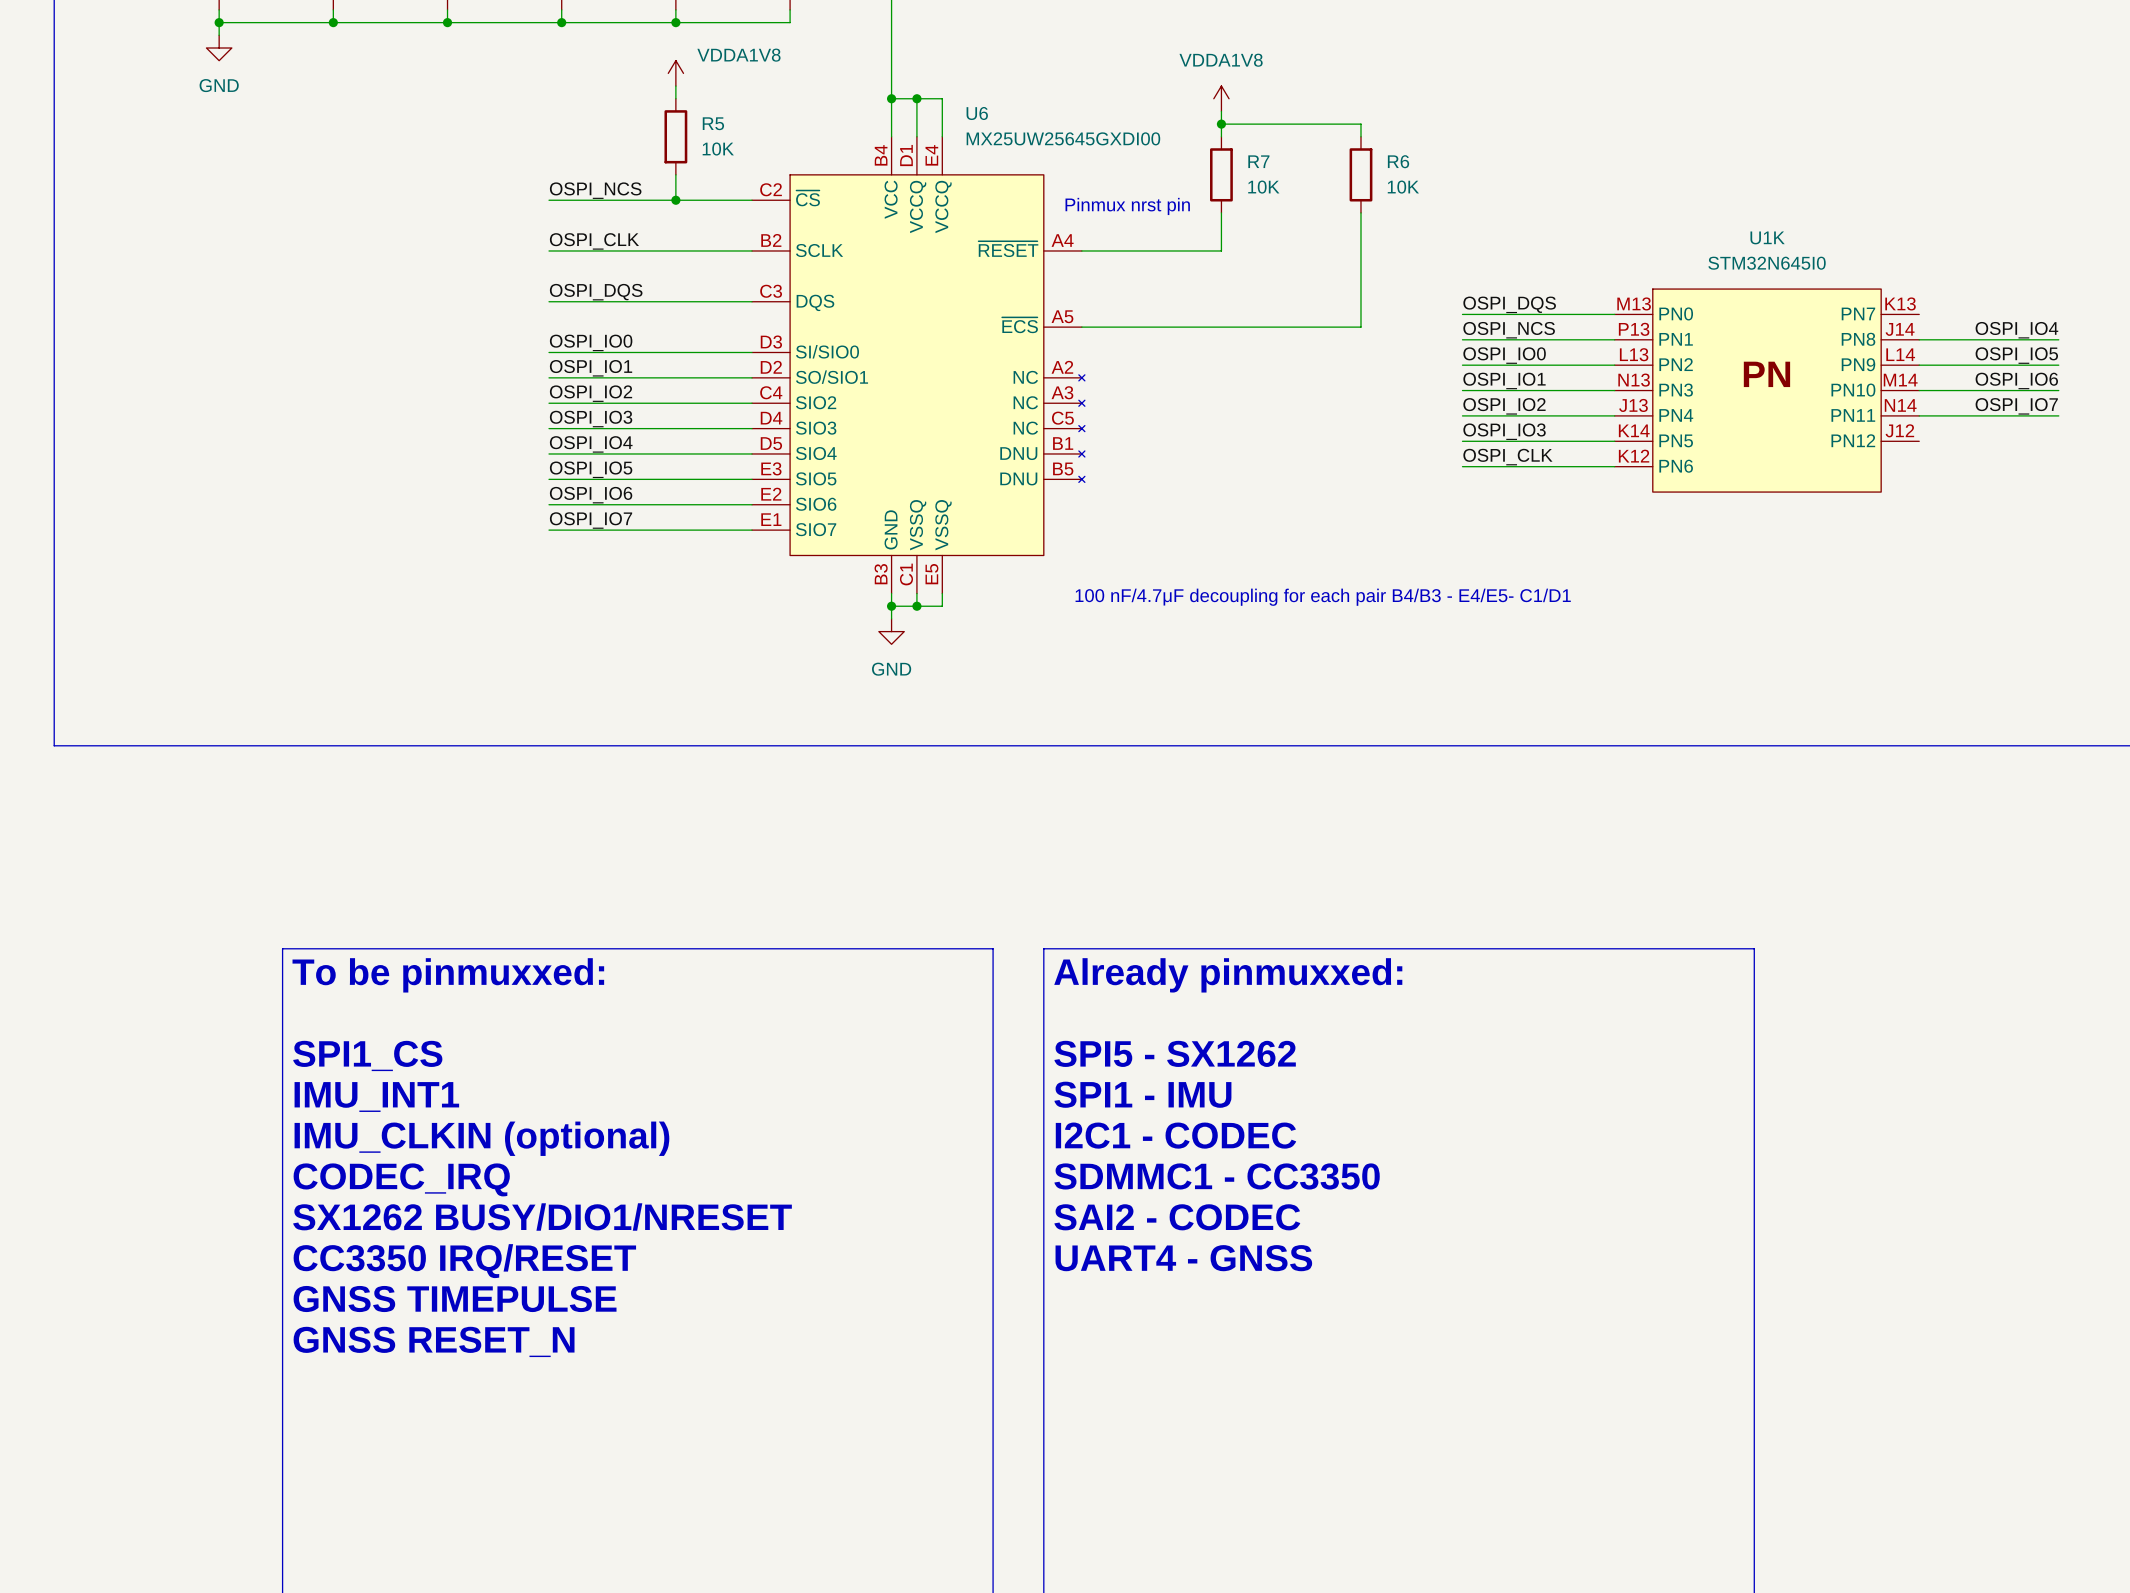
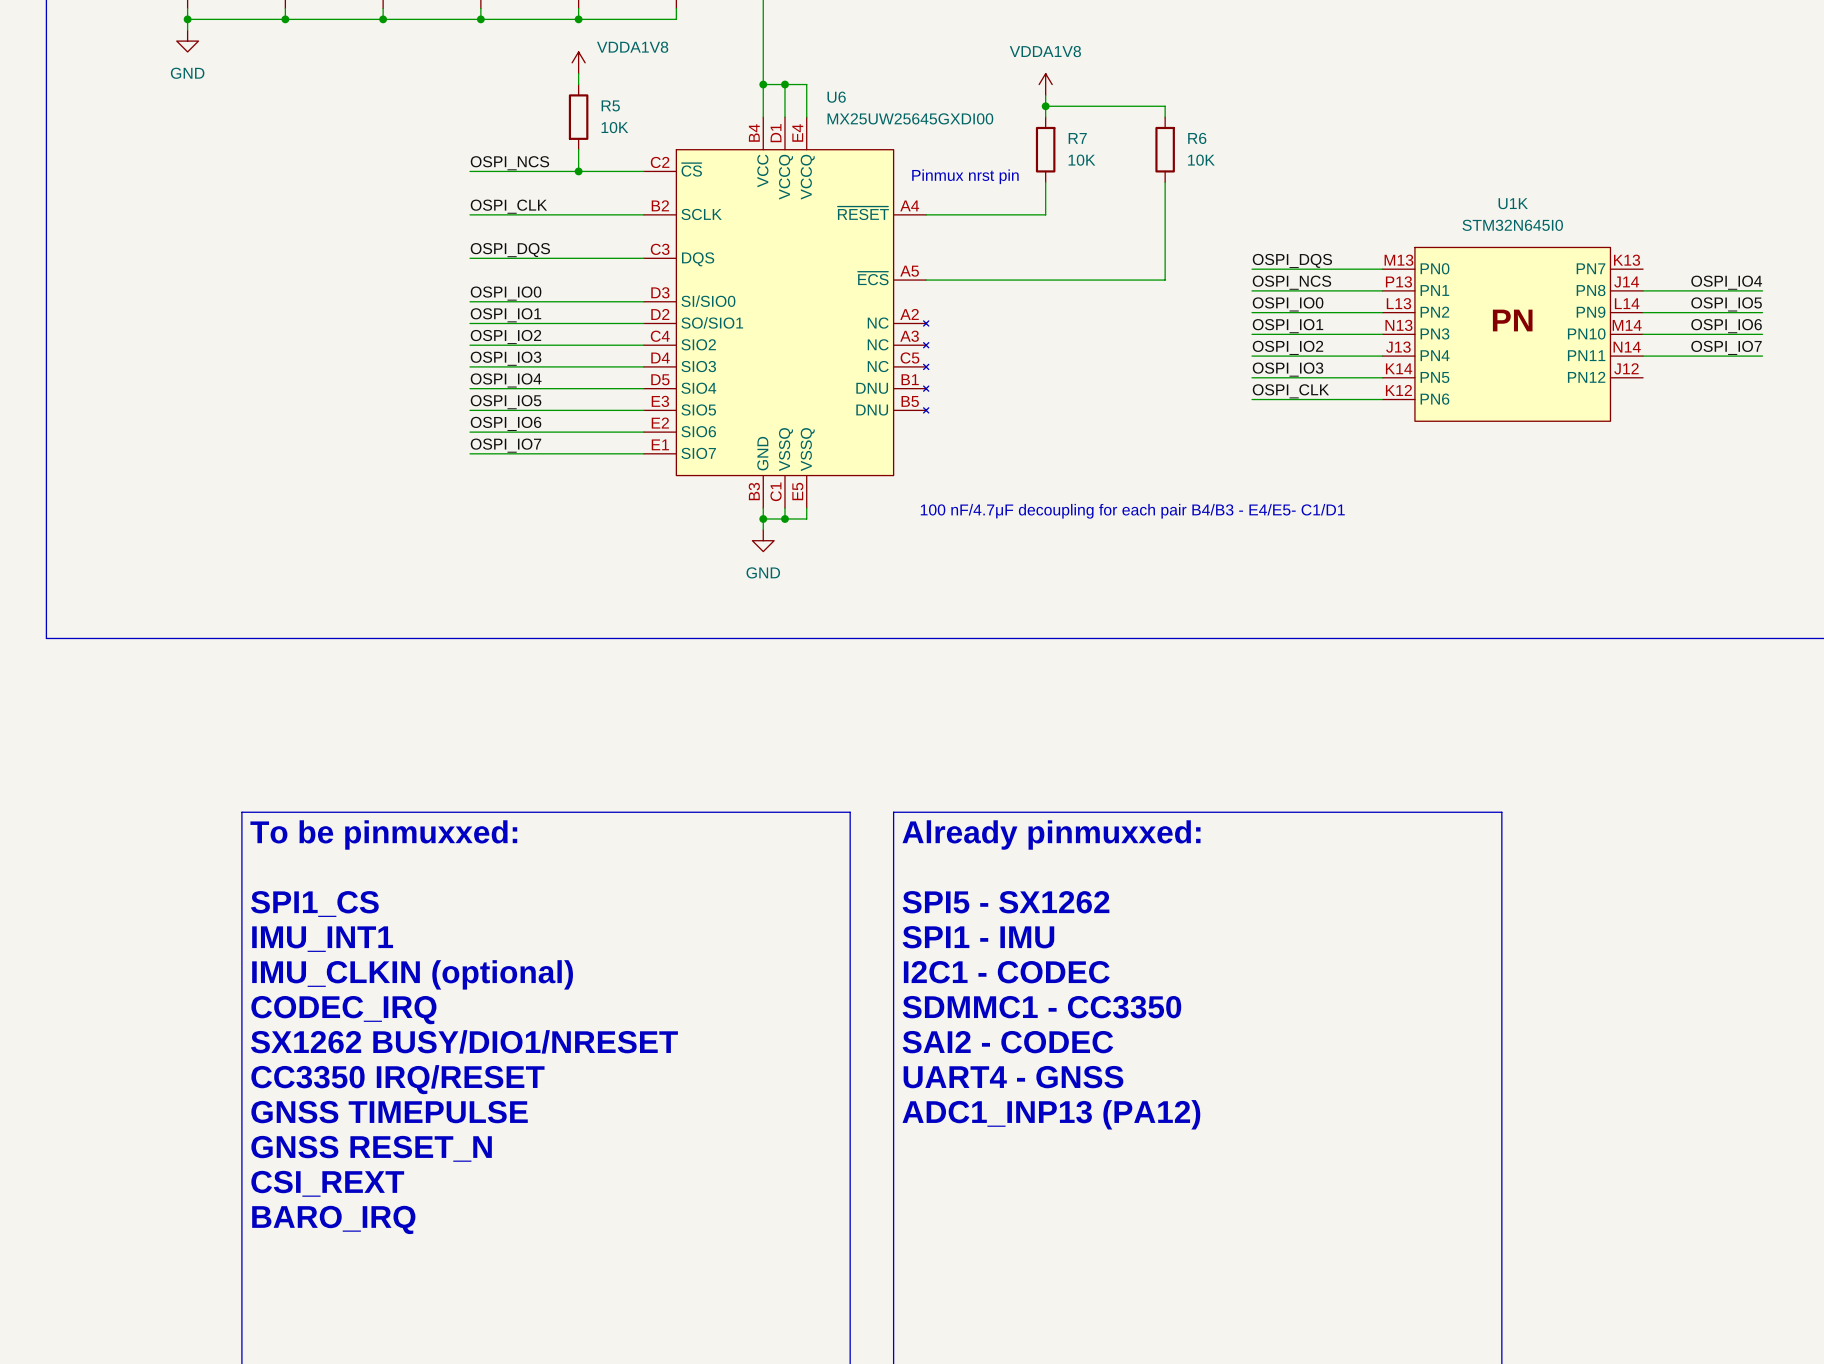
text: none -> ADC1_INP13 (PA12) (1051, 1114)
text: none -> CSI_REXT (327, 1183)
text: none -> BARO_IRQ (333, 1219)

